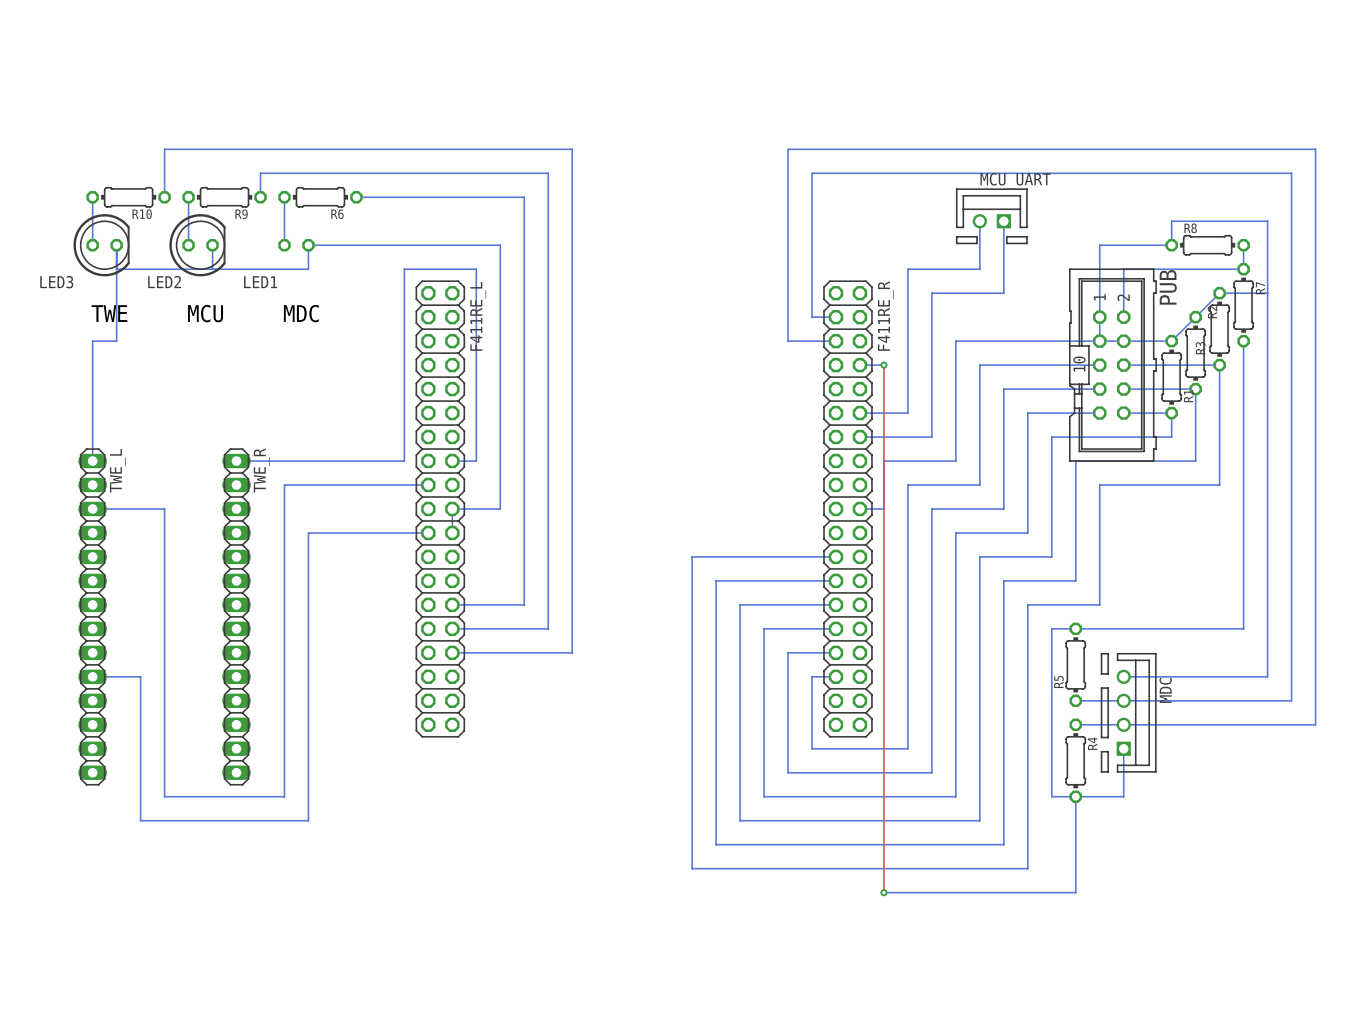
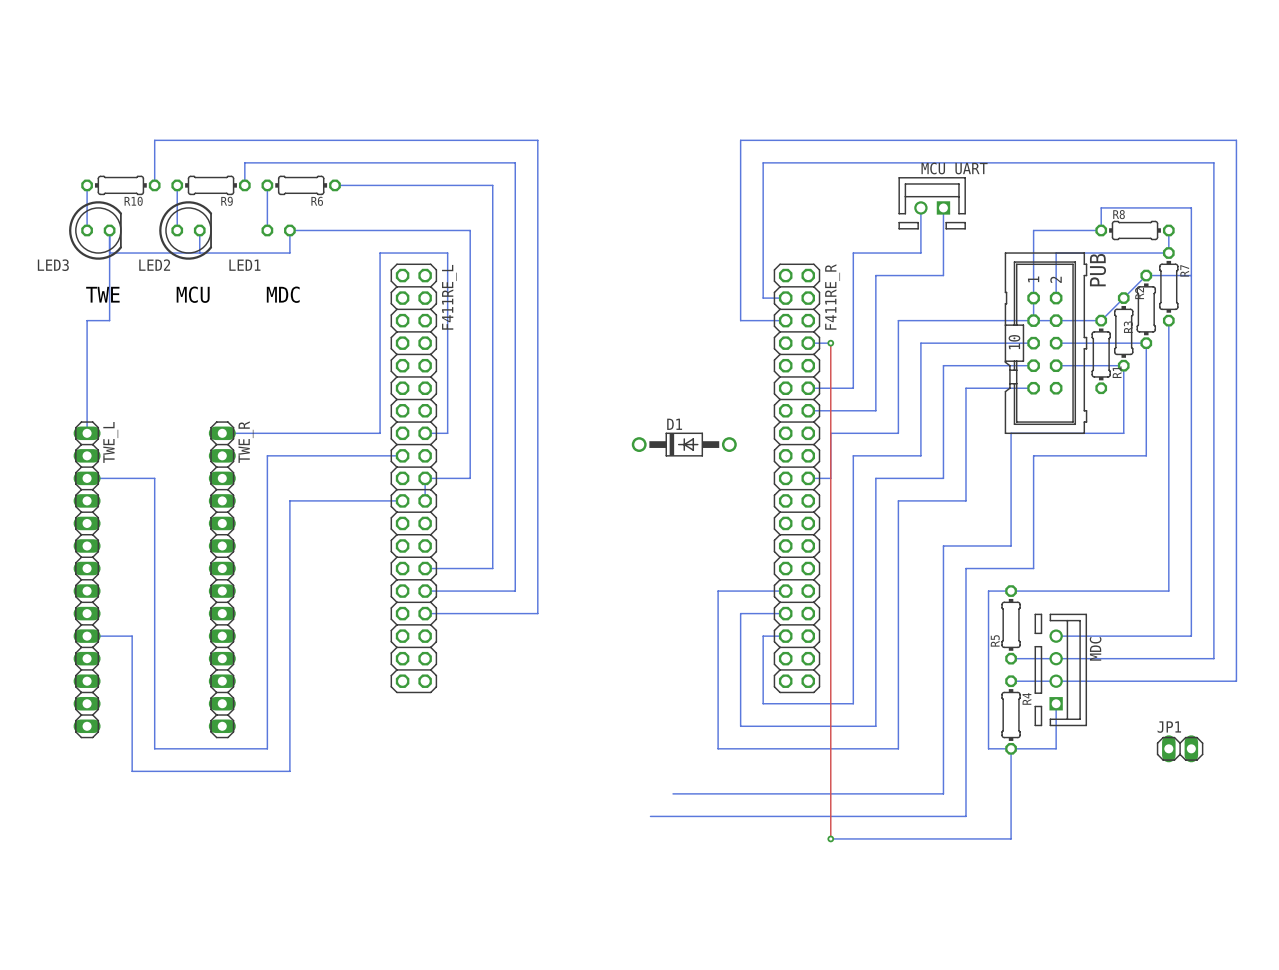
bottom track: (1123, 413) (1171, 413) (1171, 437) (1051, 437) (1051, 556) (979, 556) (979, 820) (740, 820) (740, 604) (835, 604) -> none
D1: none -> (684, 444)
bottom track: (835, 556) (692, 556) (692, 868) -> none
bottom track: (835, 580) (716, 580) (716, 844) -> none
JP1: none -> (1180, 748)

